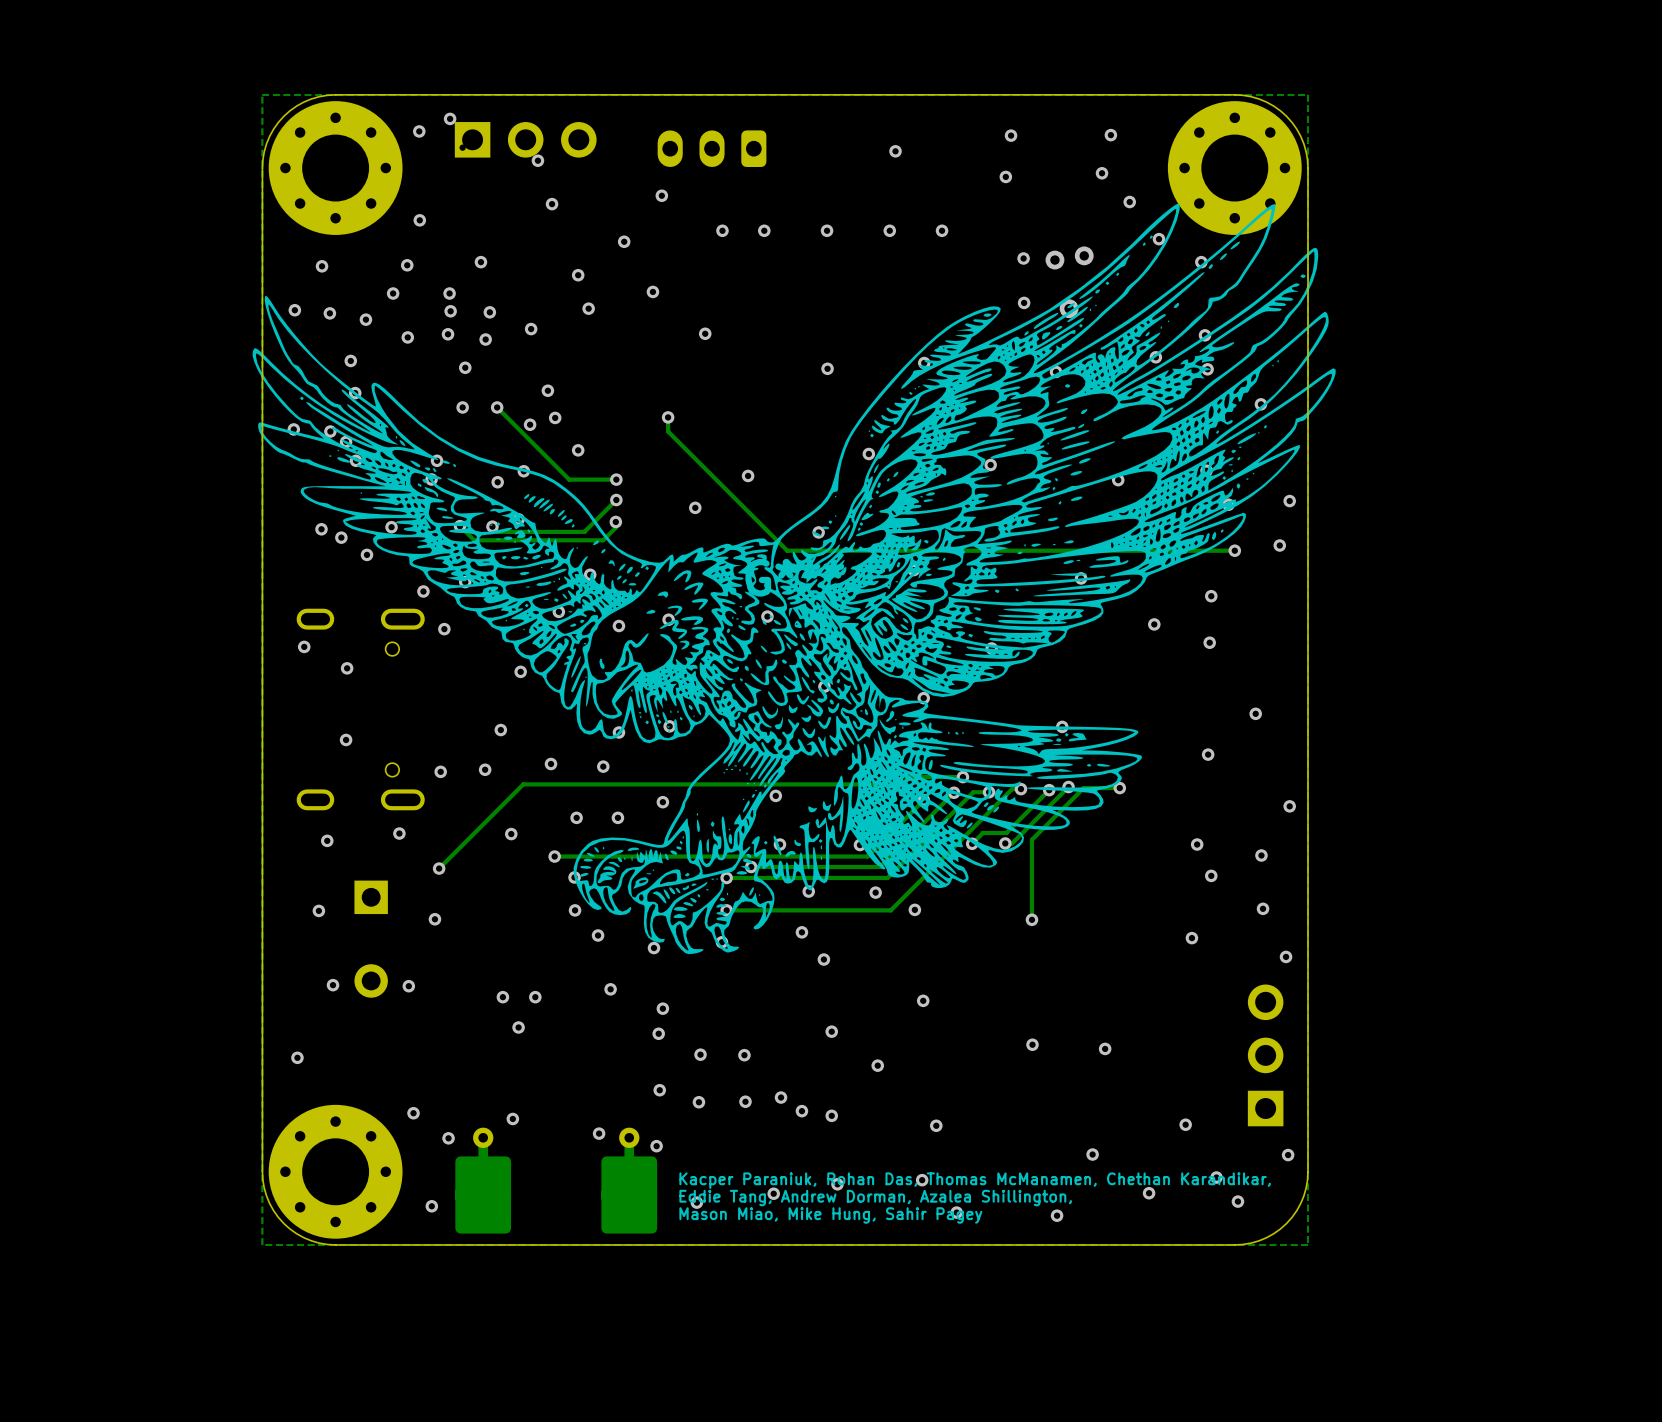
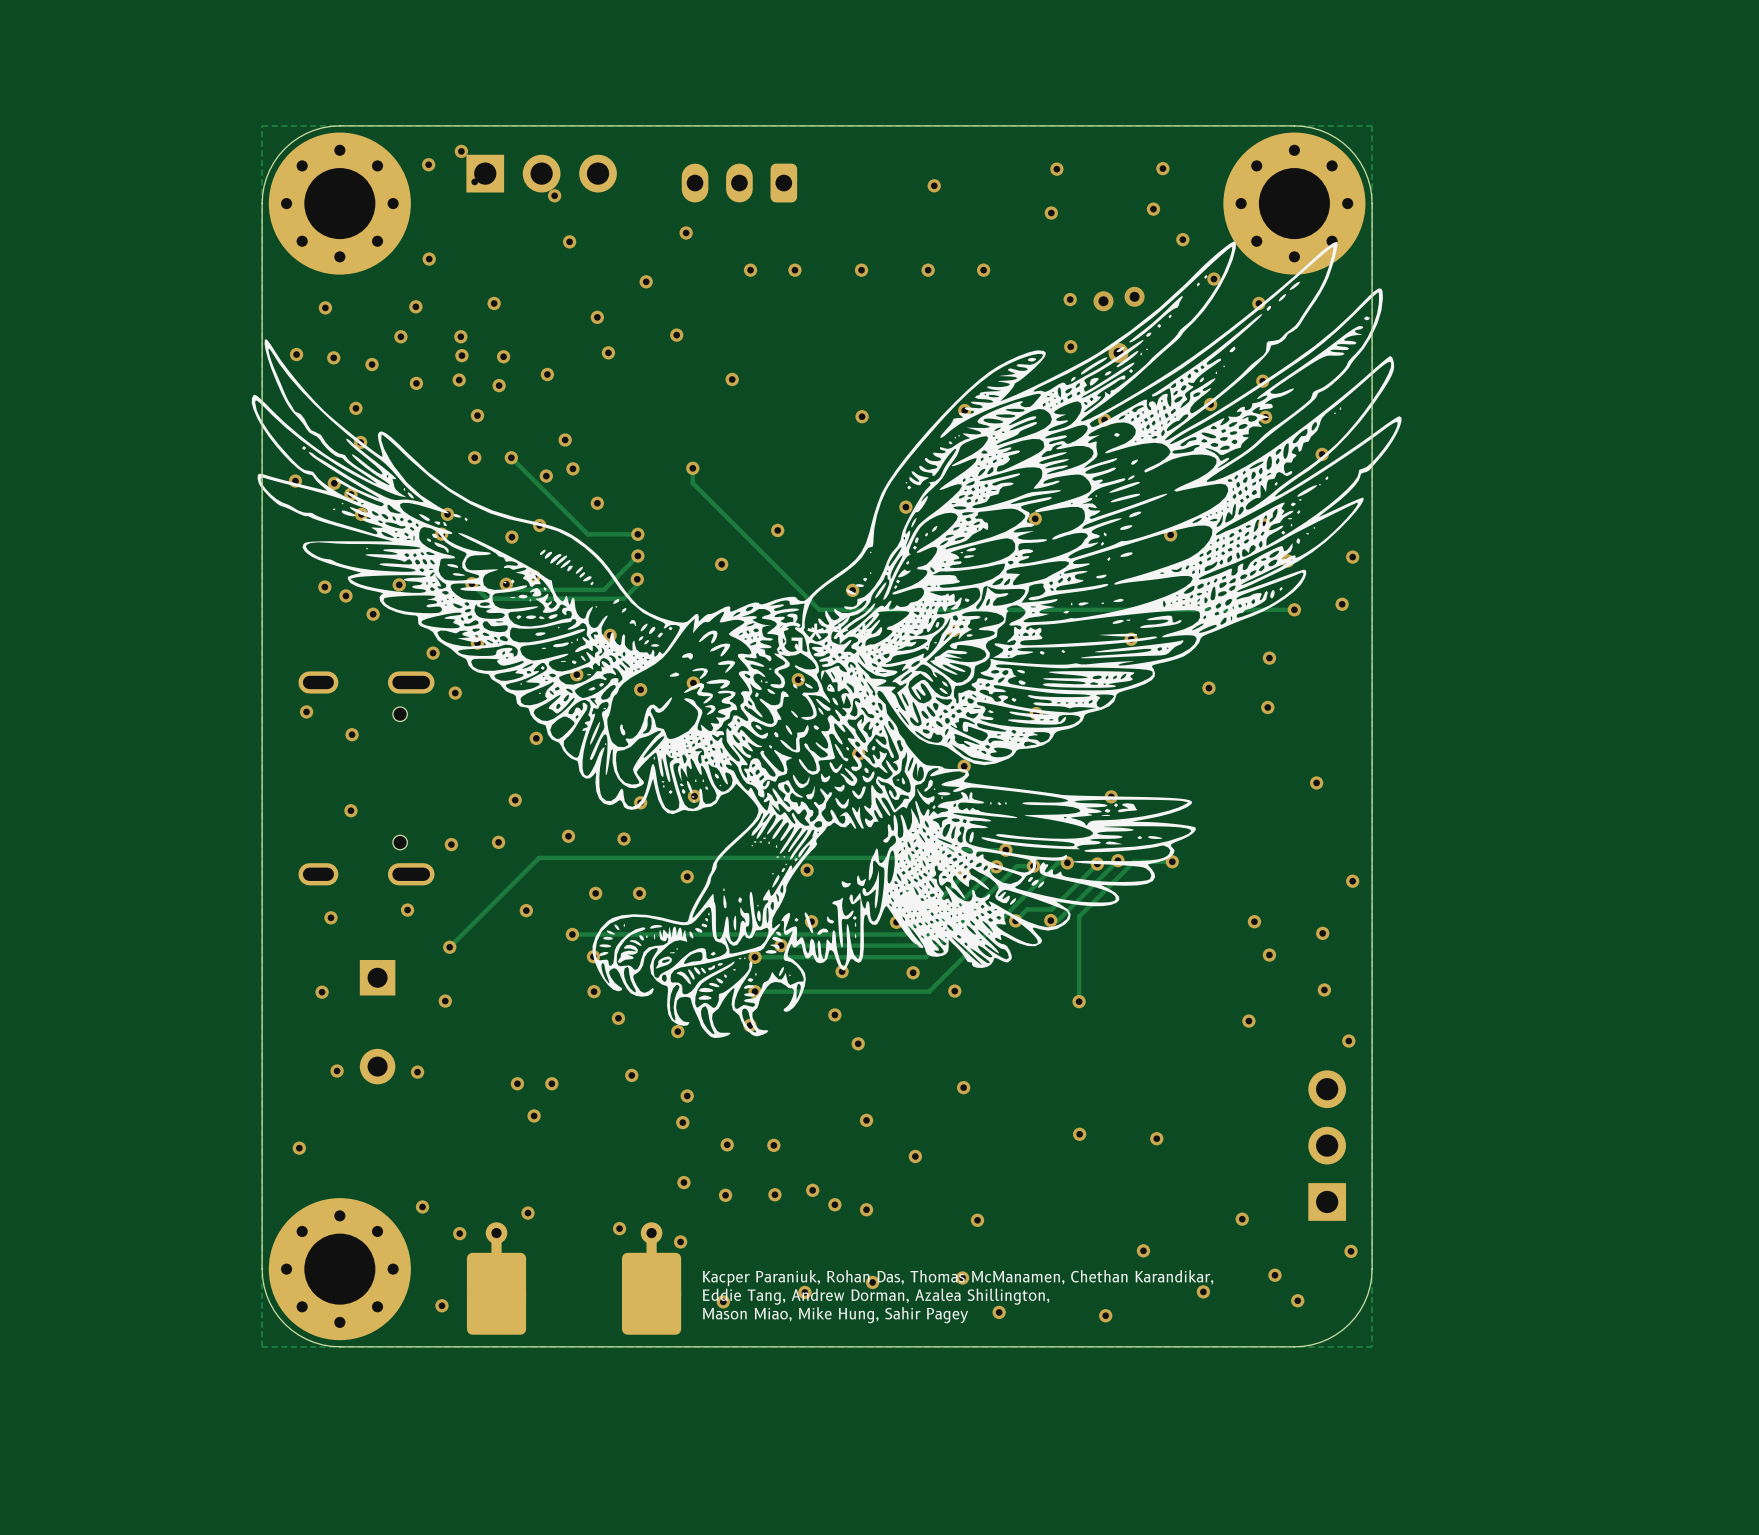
via: (1208, 754) -> none

